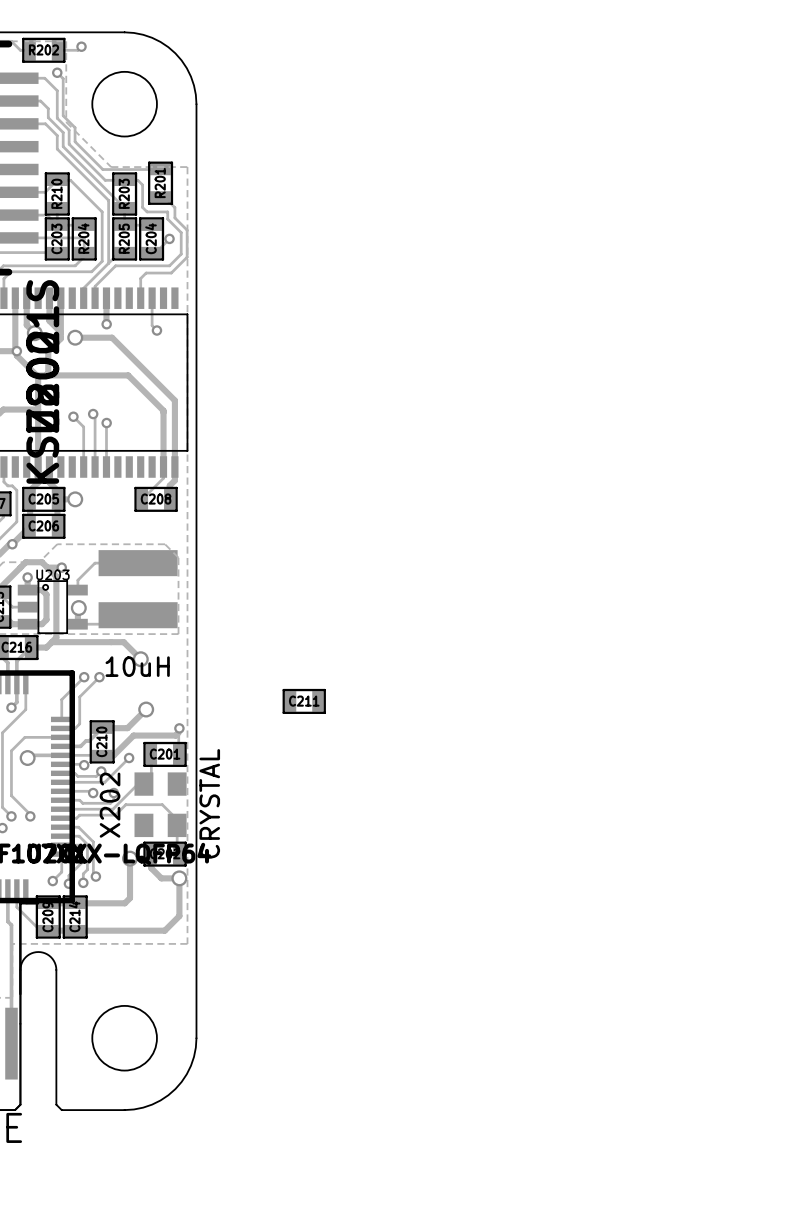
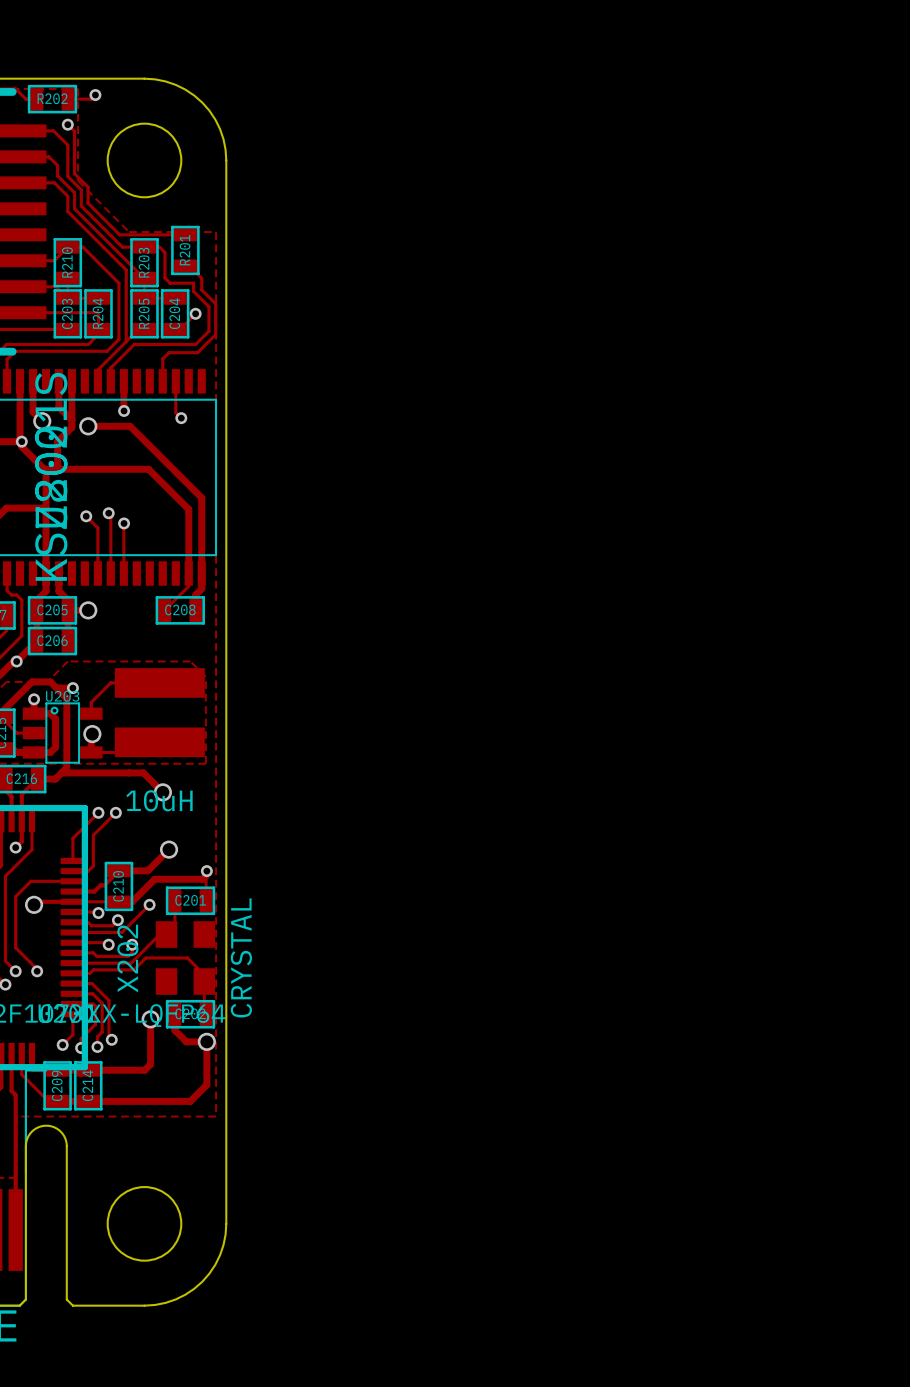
C211: (304, 701) -> none

